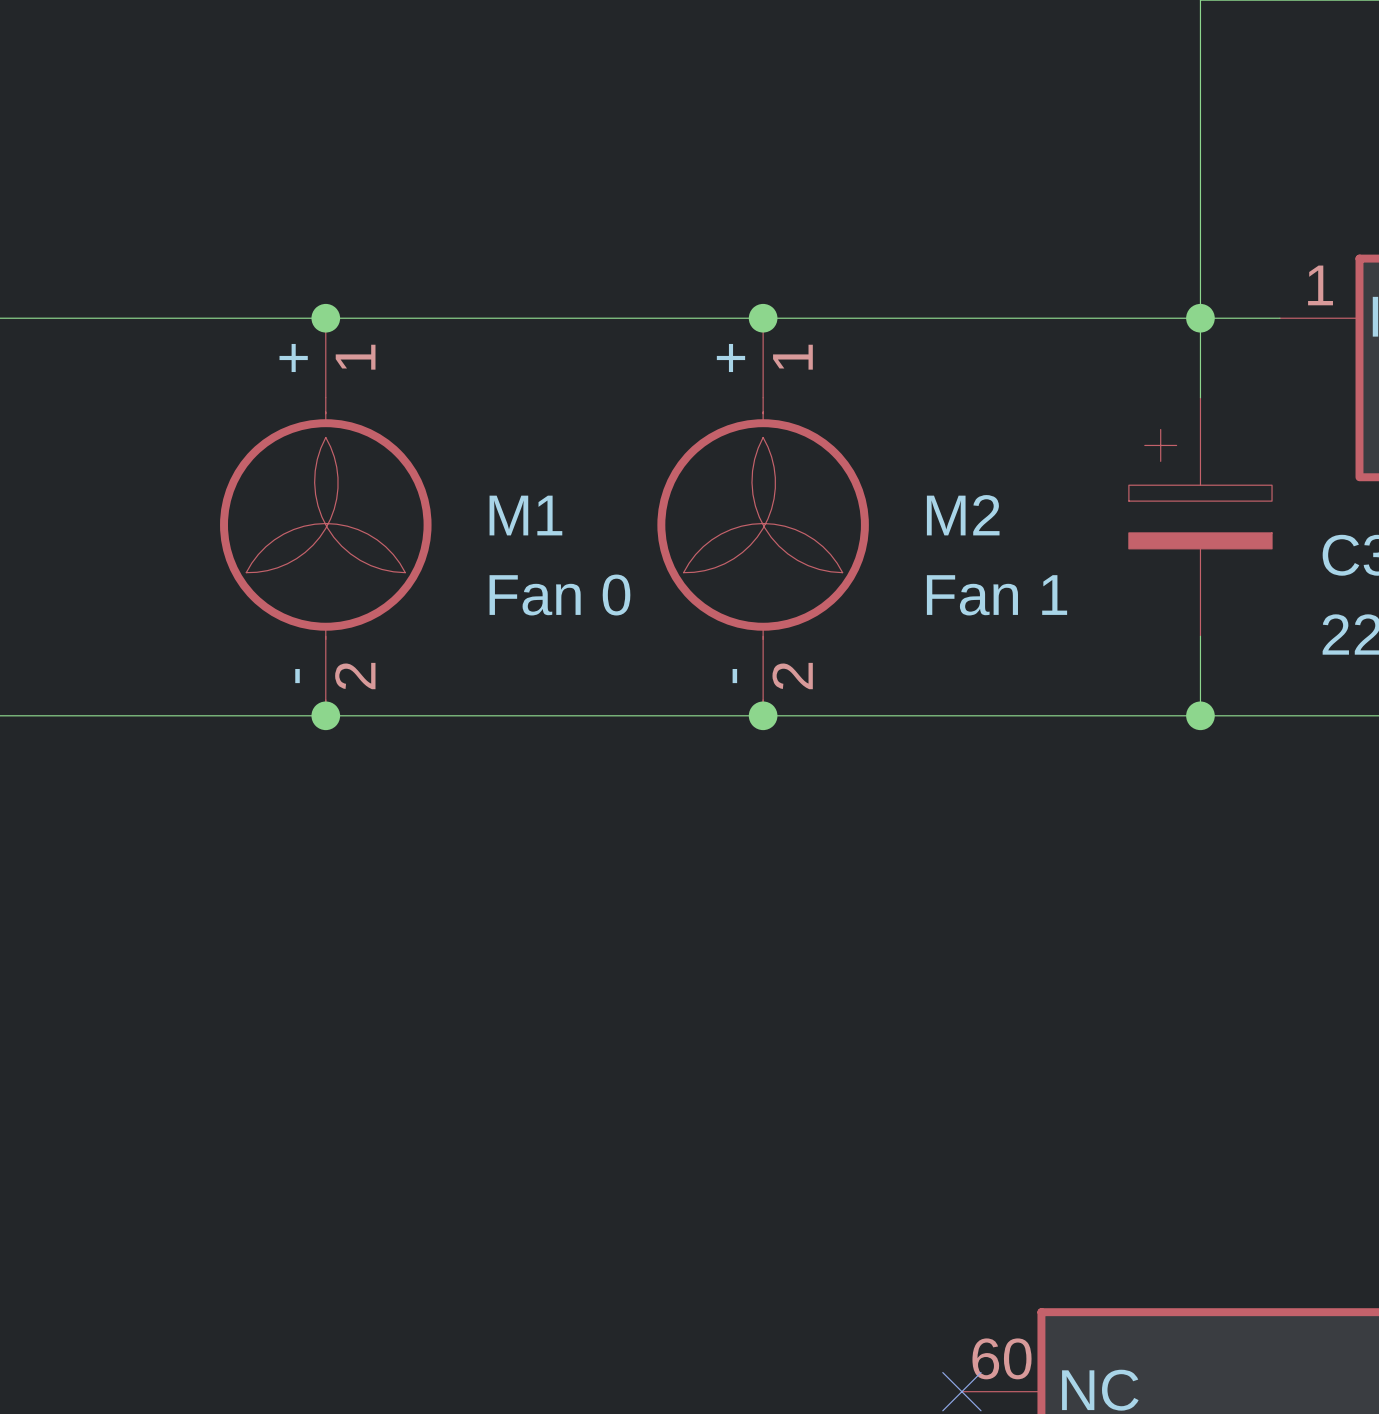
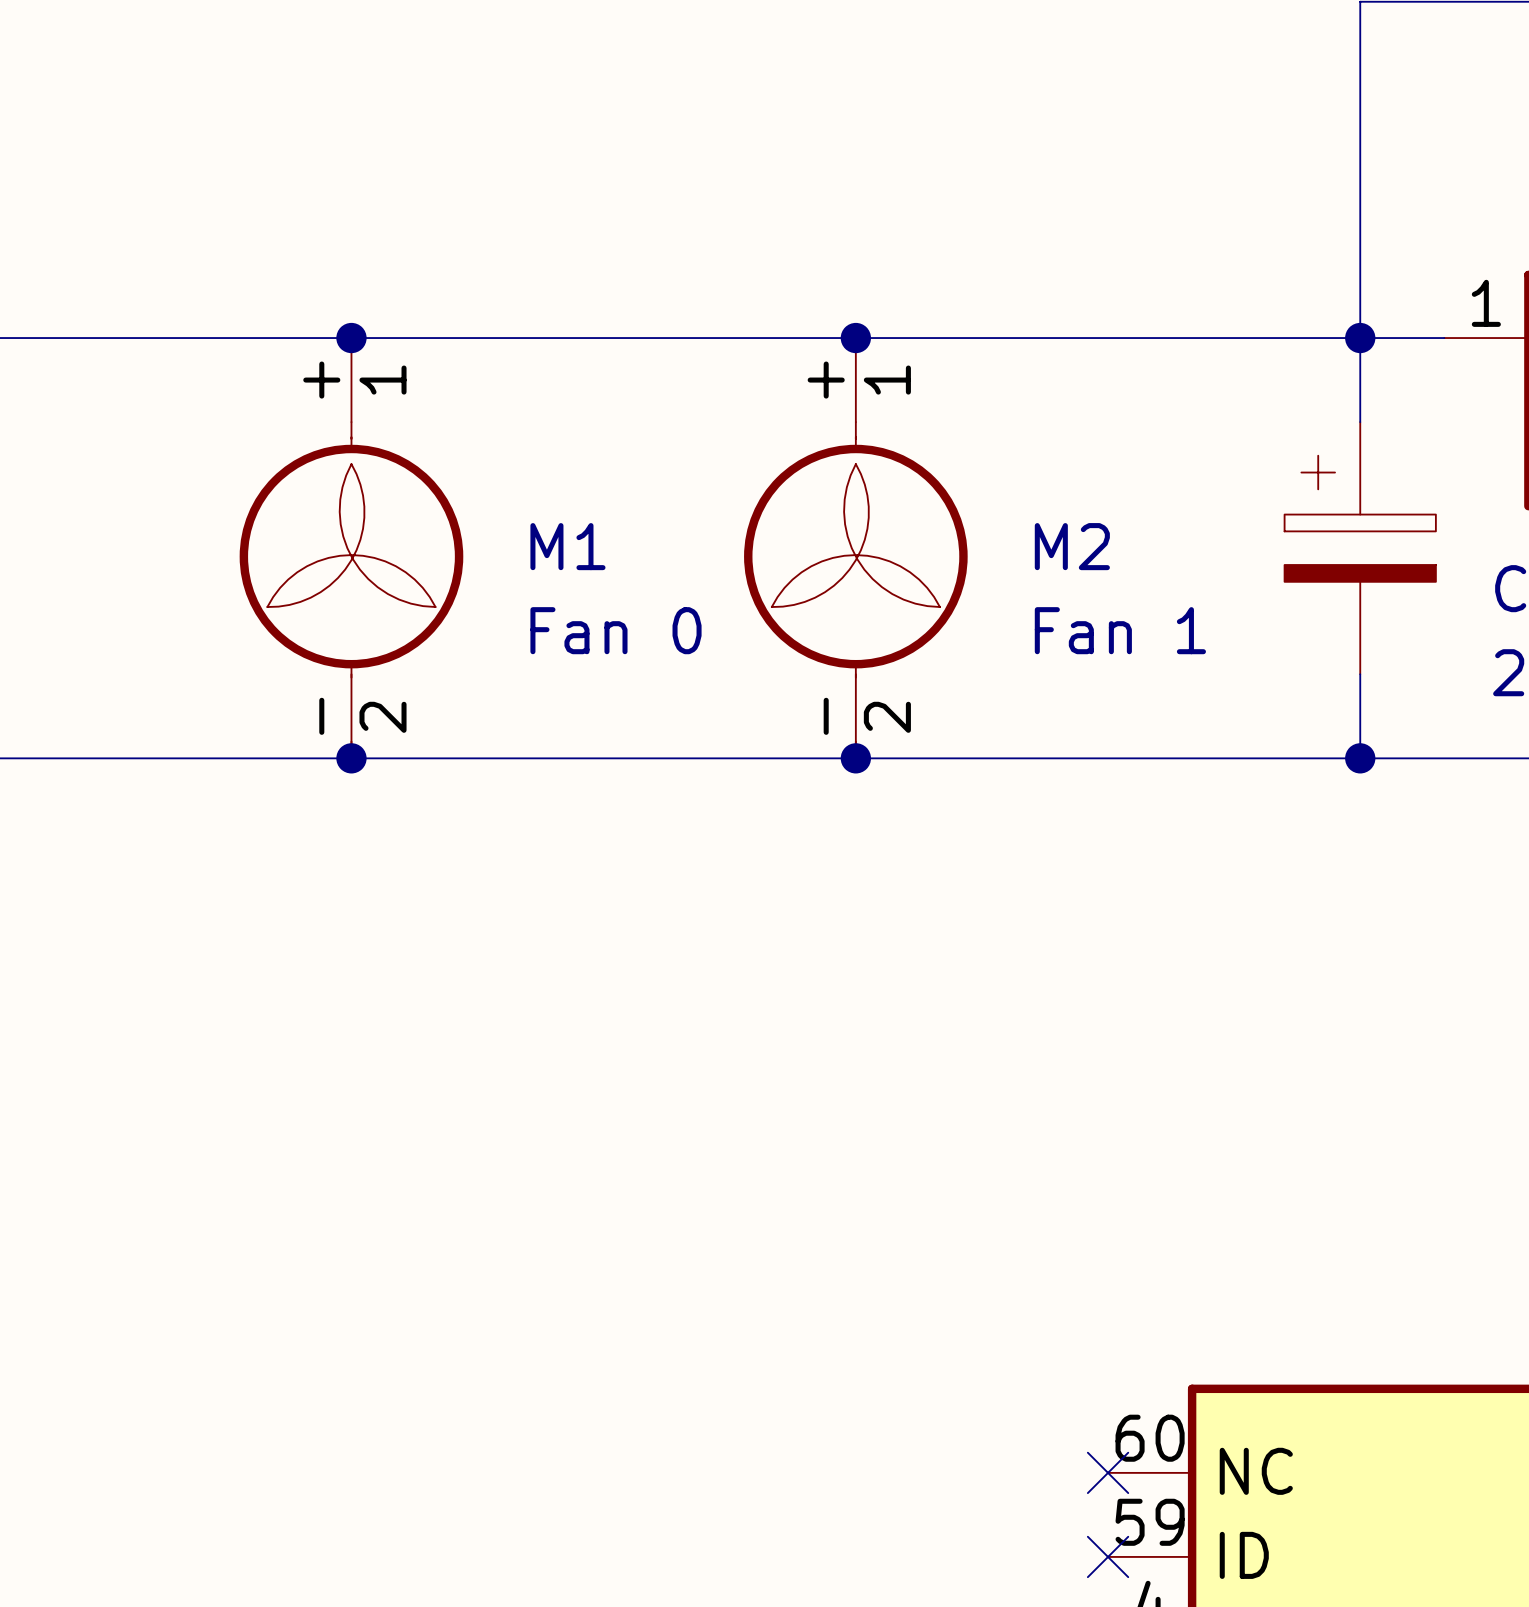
junction position: (325, 318) -> (351, 338)
junction position: (763, 318) -> (855, 338)
M1 position: (325, 517) -> (351, 548)
M2 position: (763, 517) -> (855, 548)
junction position: (325, 715) -> (351, 758)
junction position: (763, 715) -> (855, 758)

